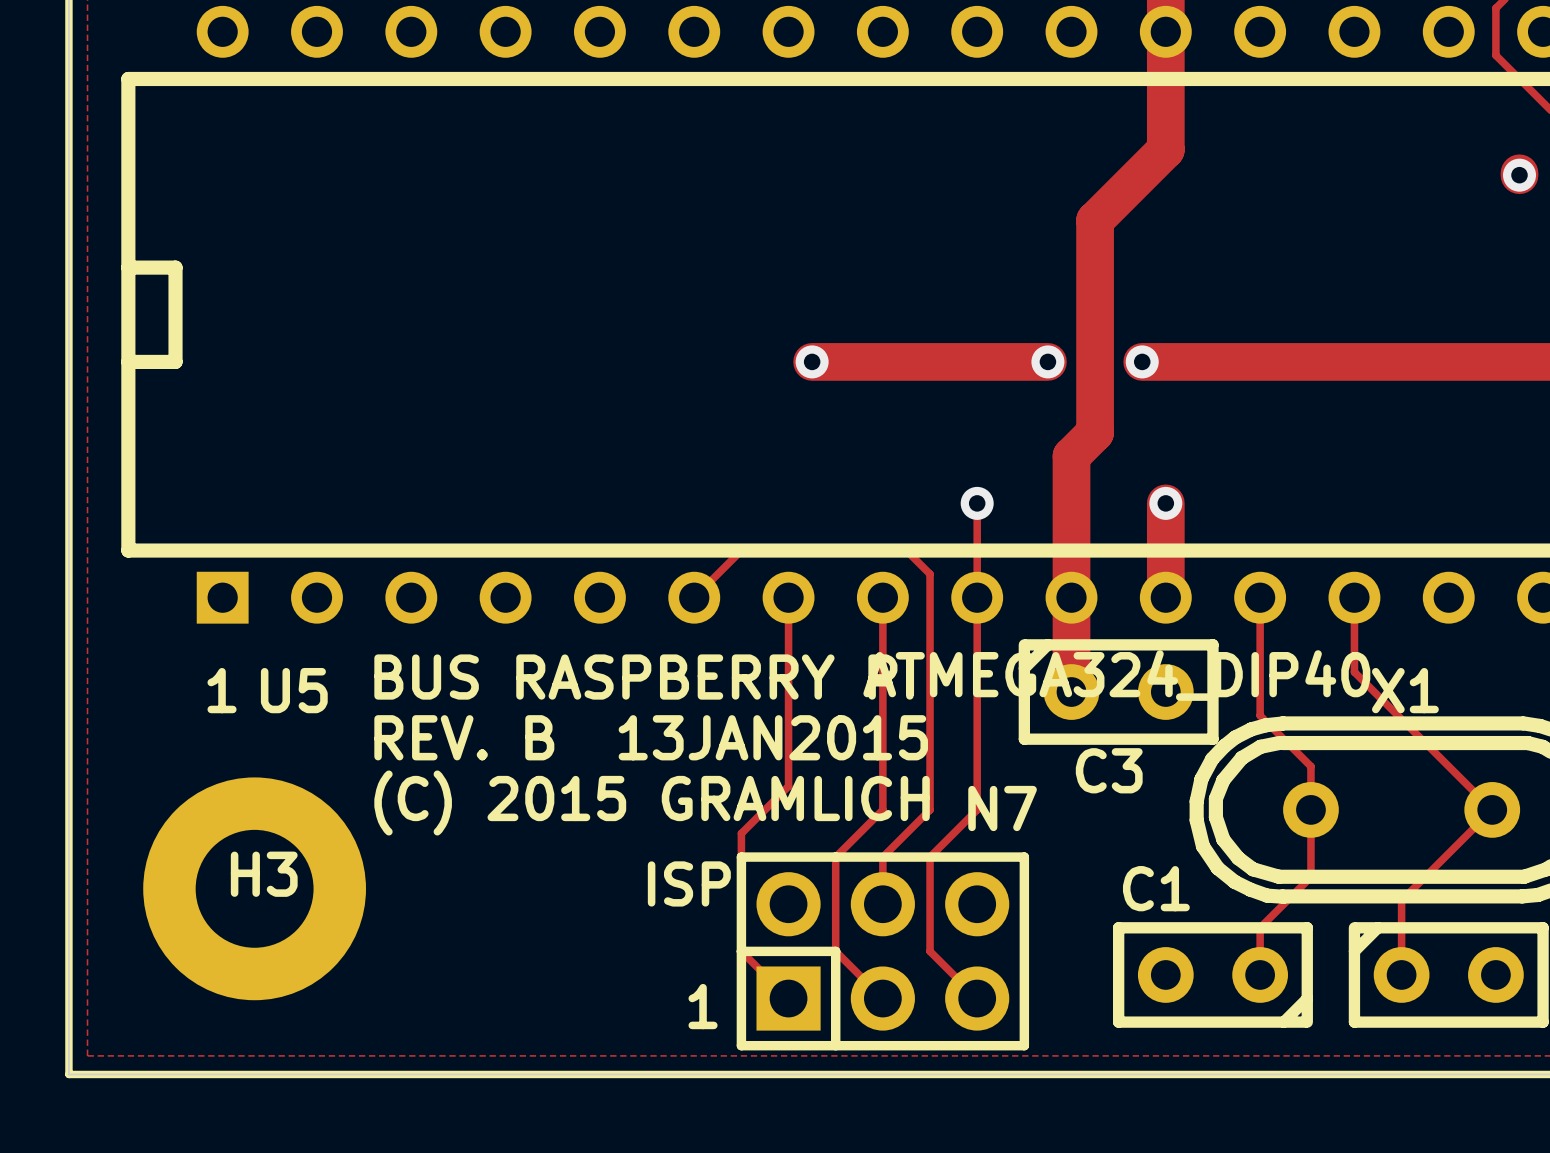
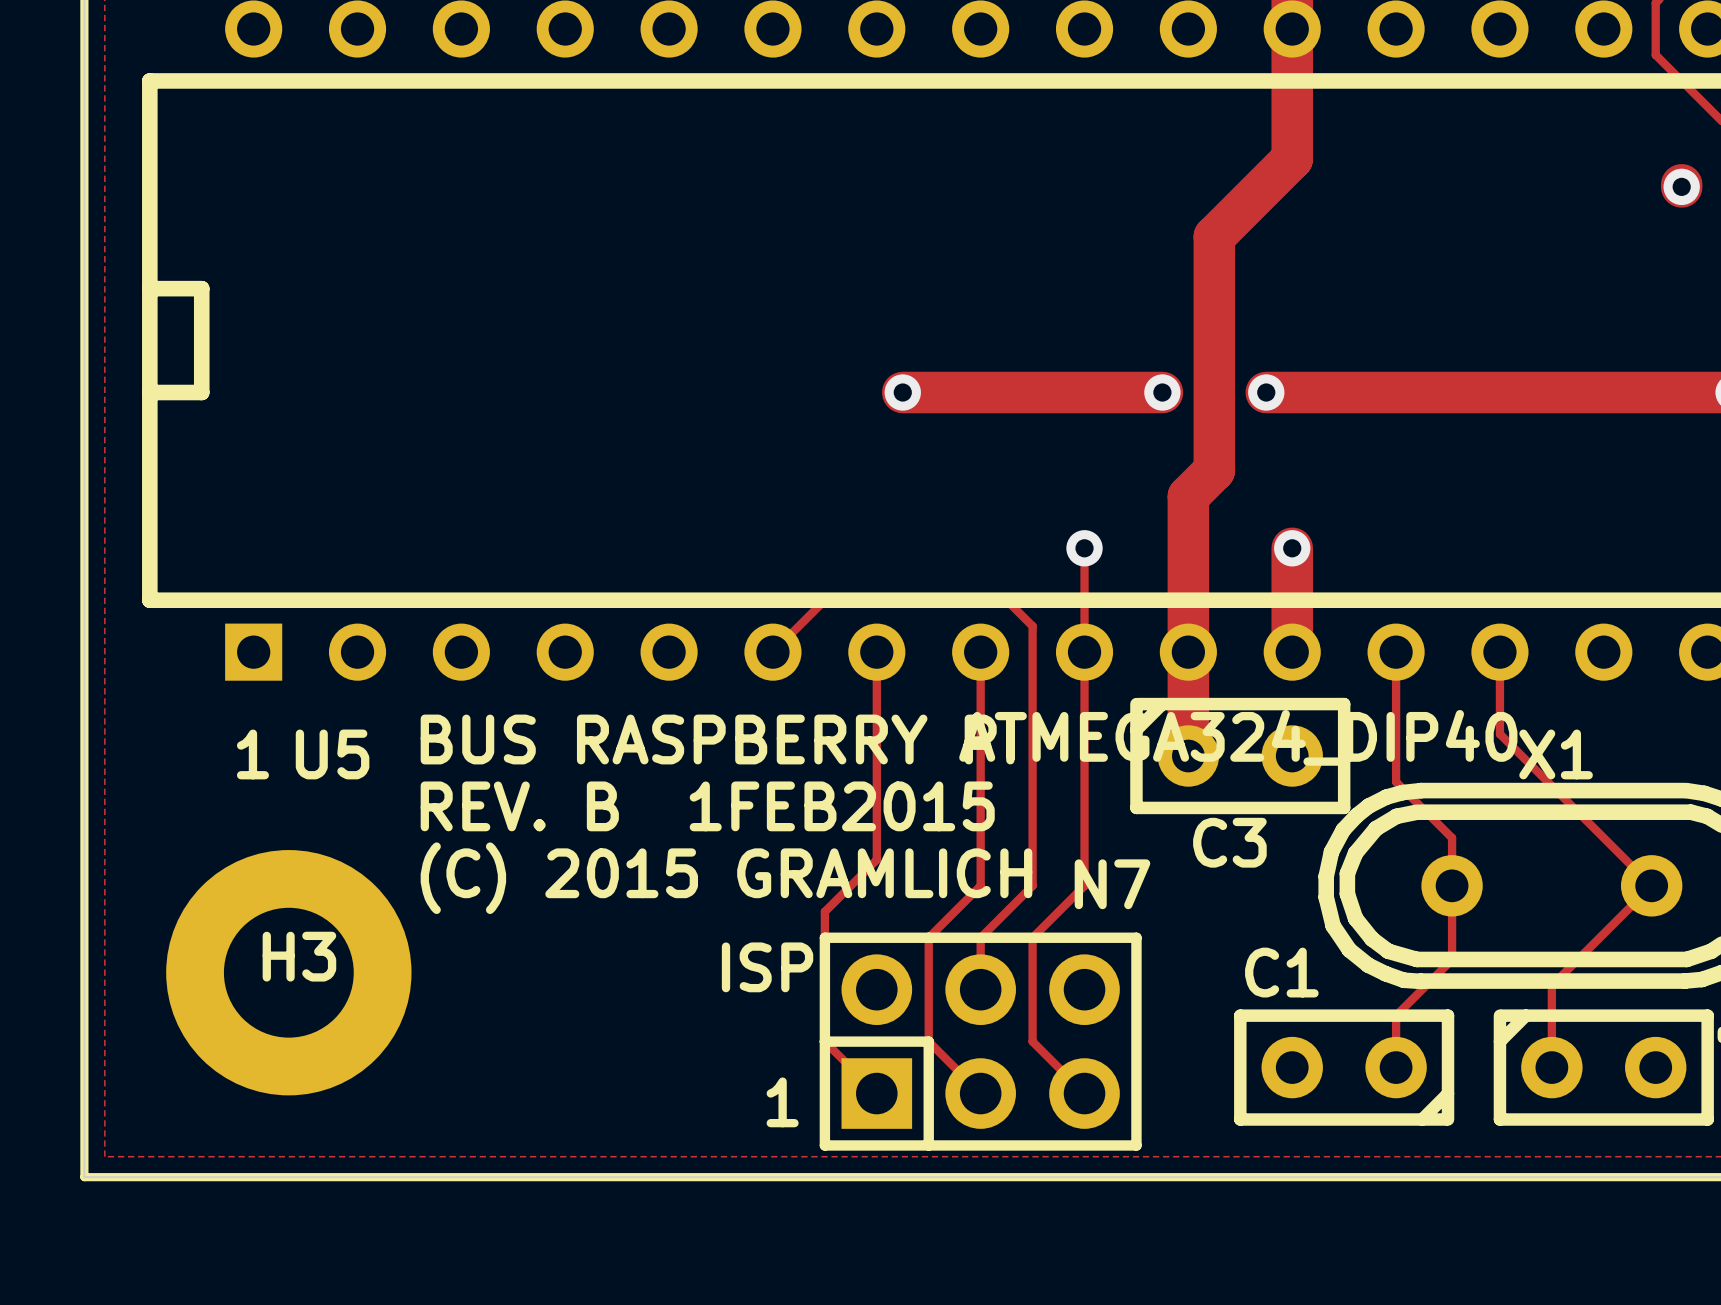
text: REV. B 13JAN2015 (651, 737) -> REV. B 1FEB2015 (707, 806)

